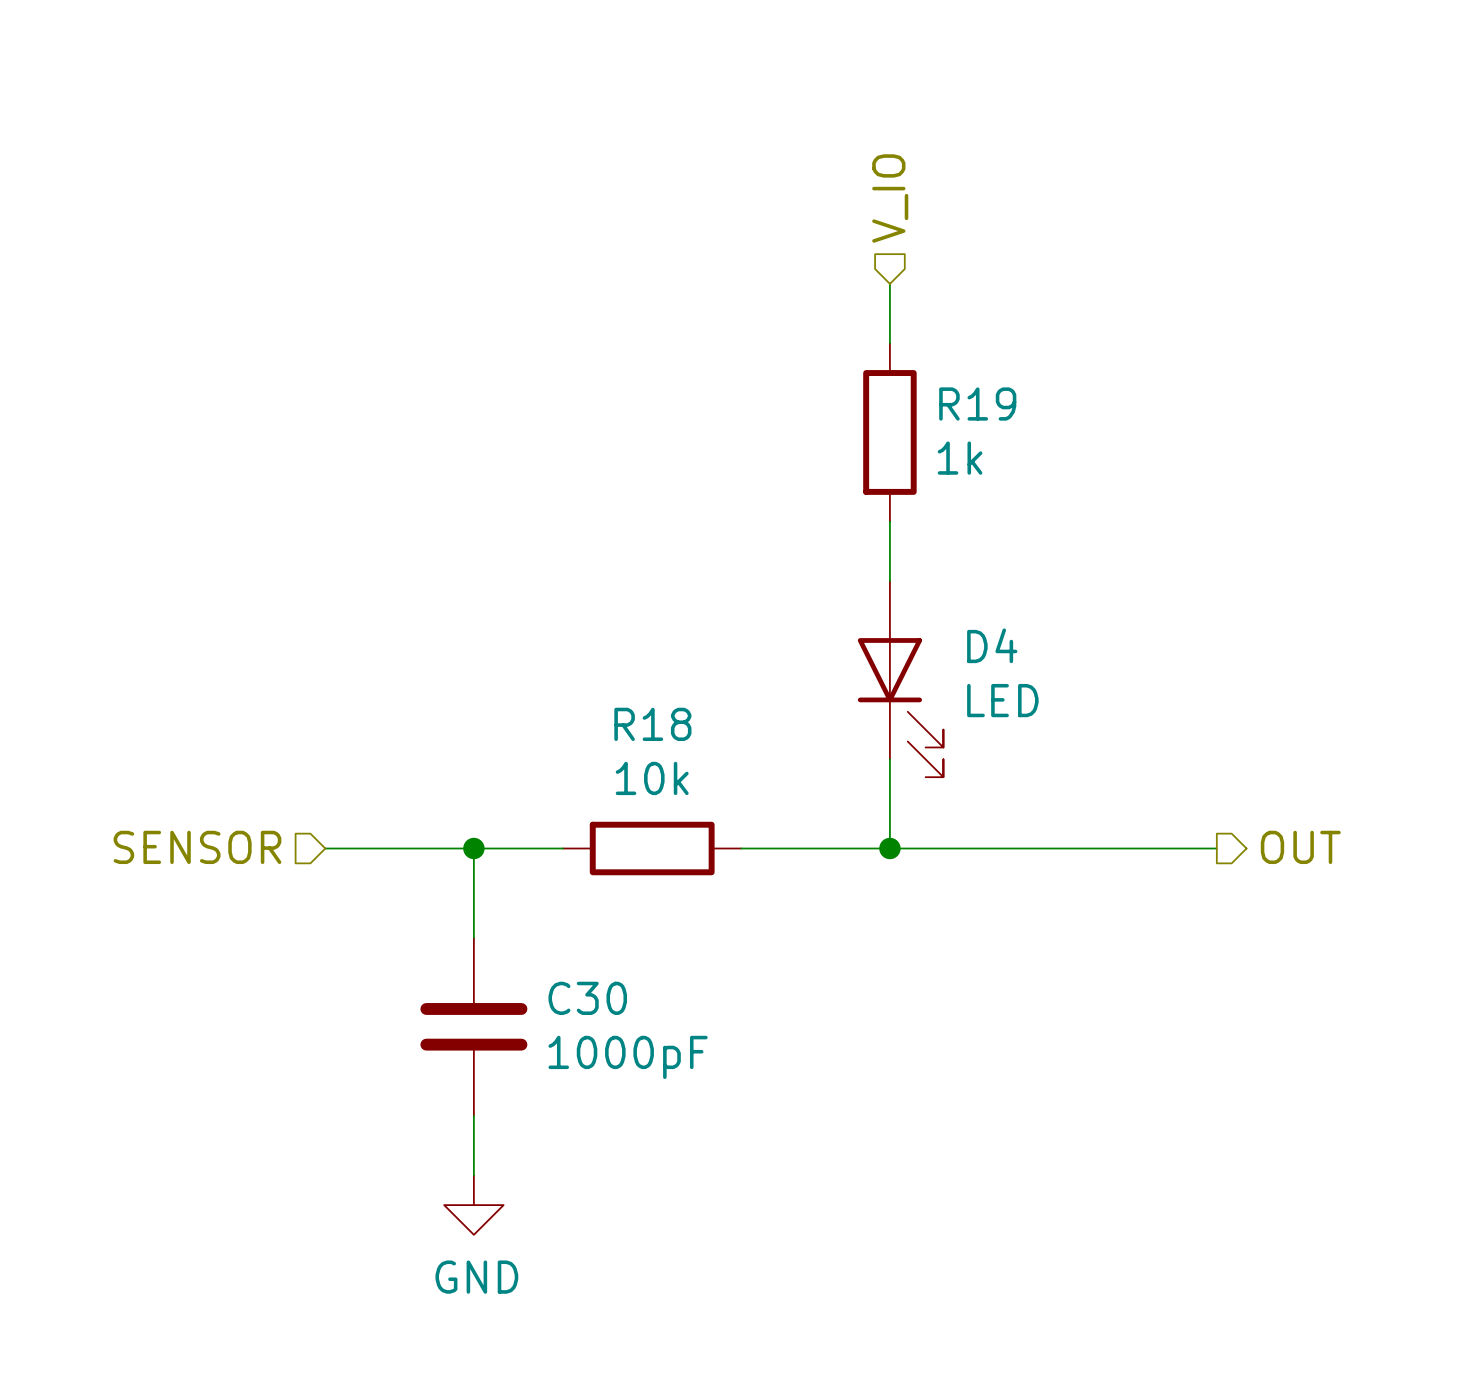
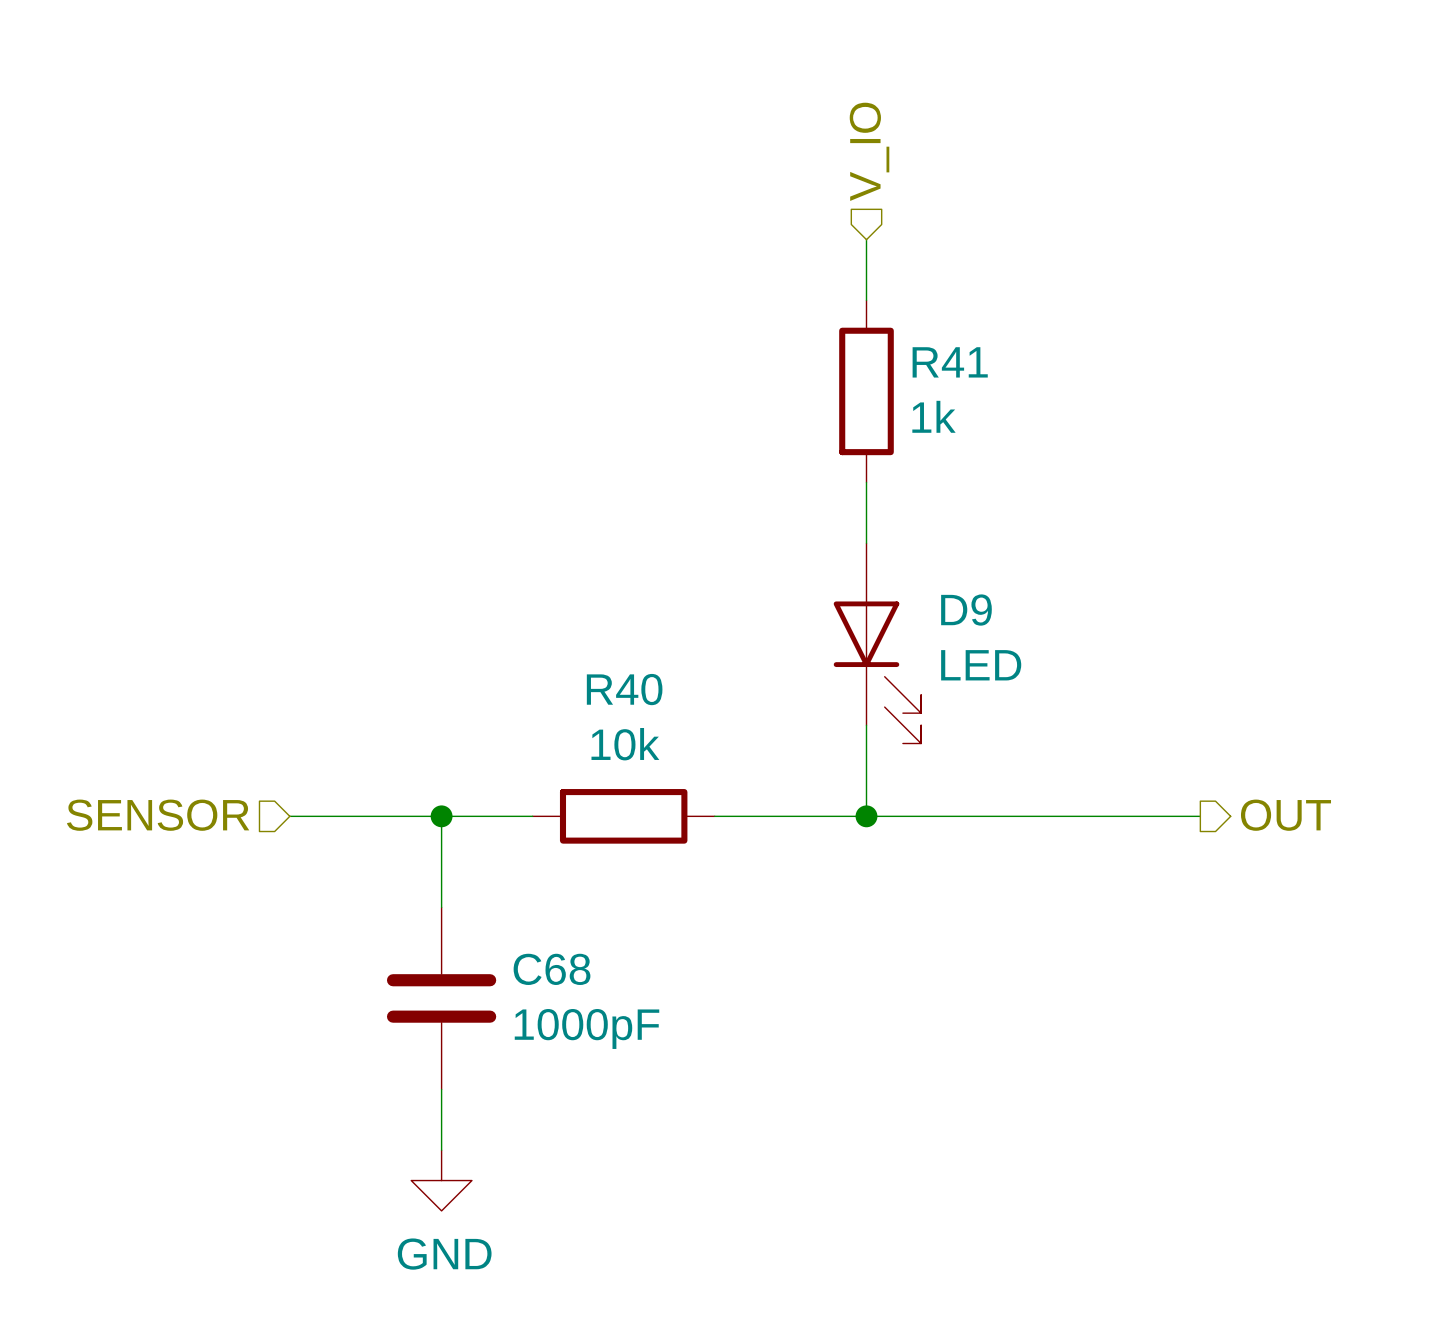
R19 name: R19 (977, 404) -> R41 (950, 362)
D4 name: D4 (992, 645) -> D9 (966, 610)
R18 name: R18 (652, 724) -> R40 (624, 689)
C30 name: C30 (587, 998) -> C68 (552, 969)

